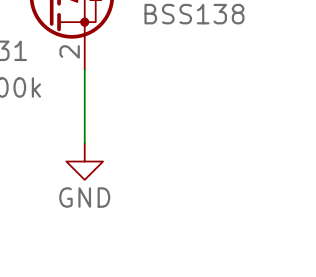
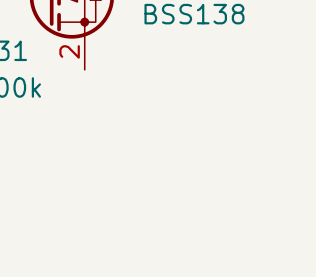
wire: (84, 69) (84, 143) -> none
power symbol: GND (84, 161) -> none

